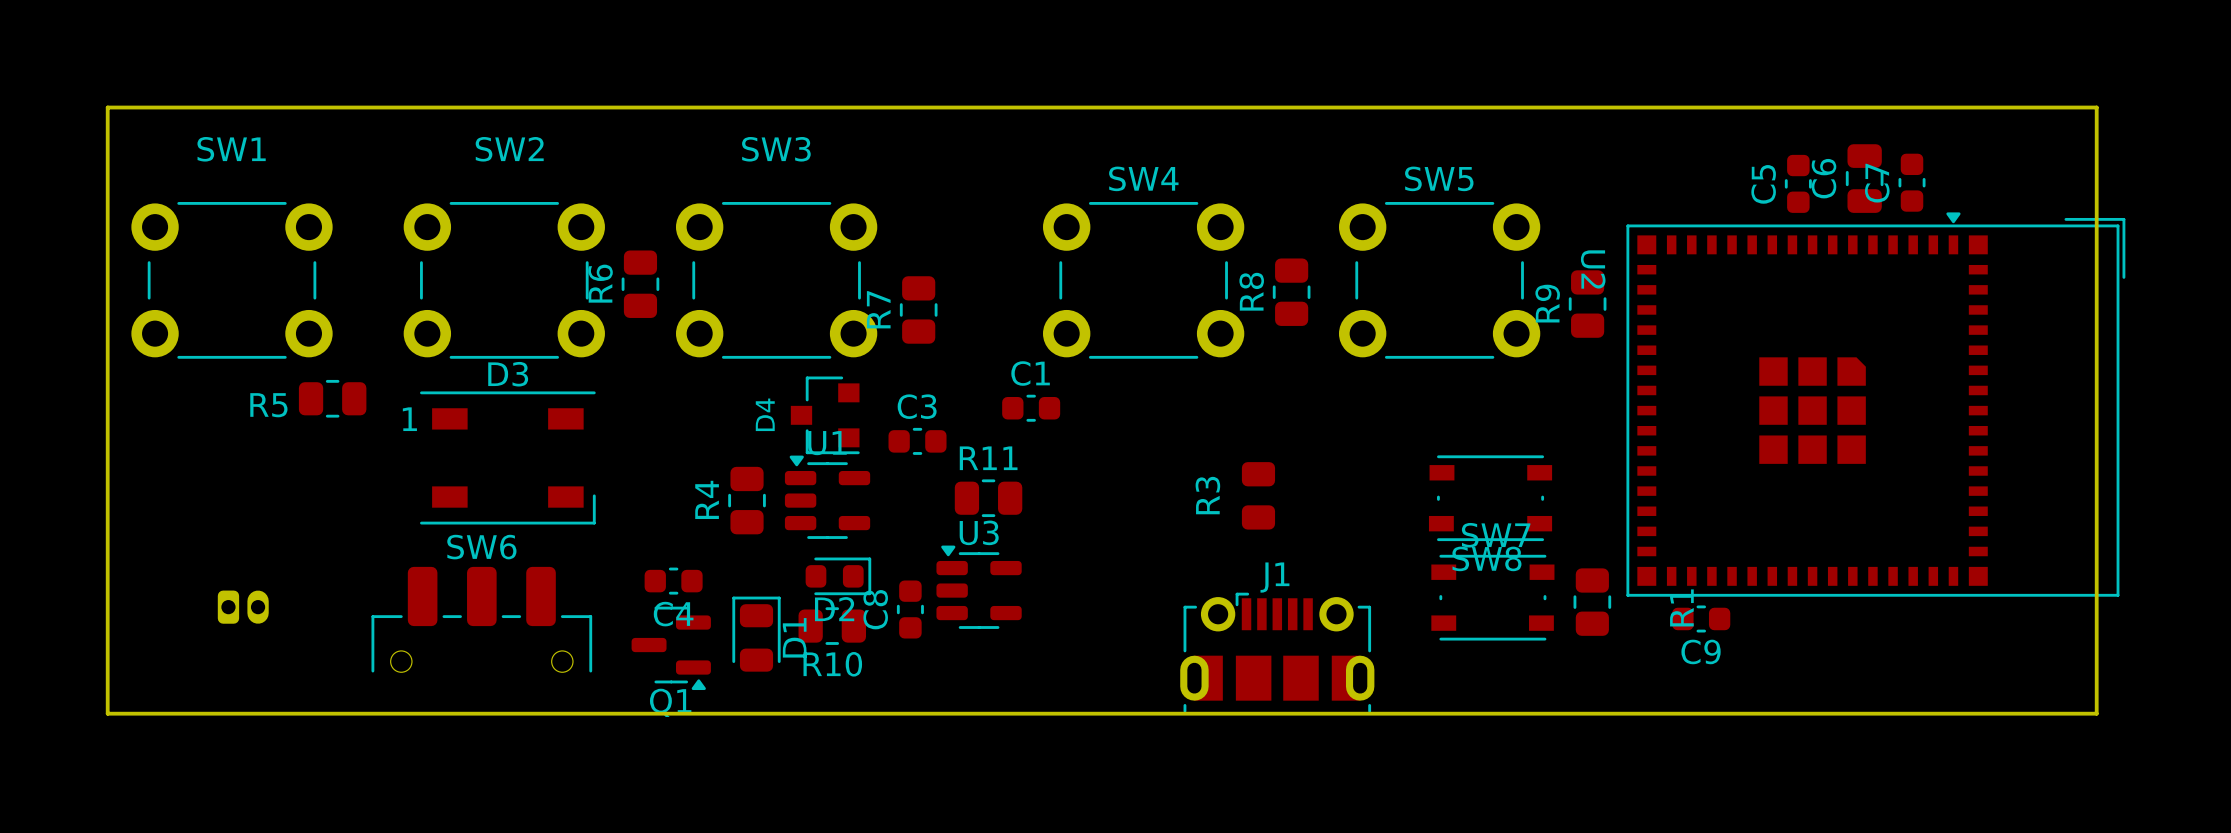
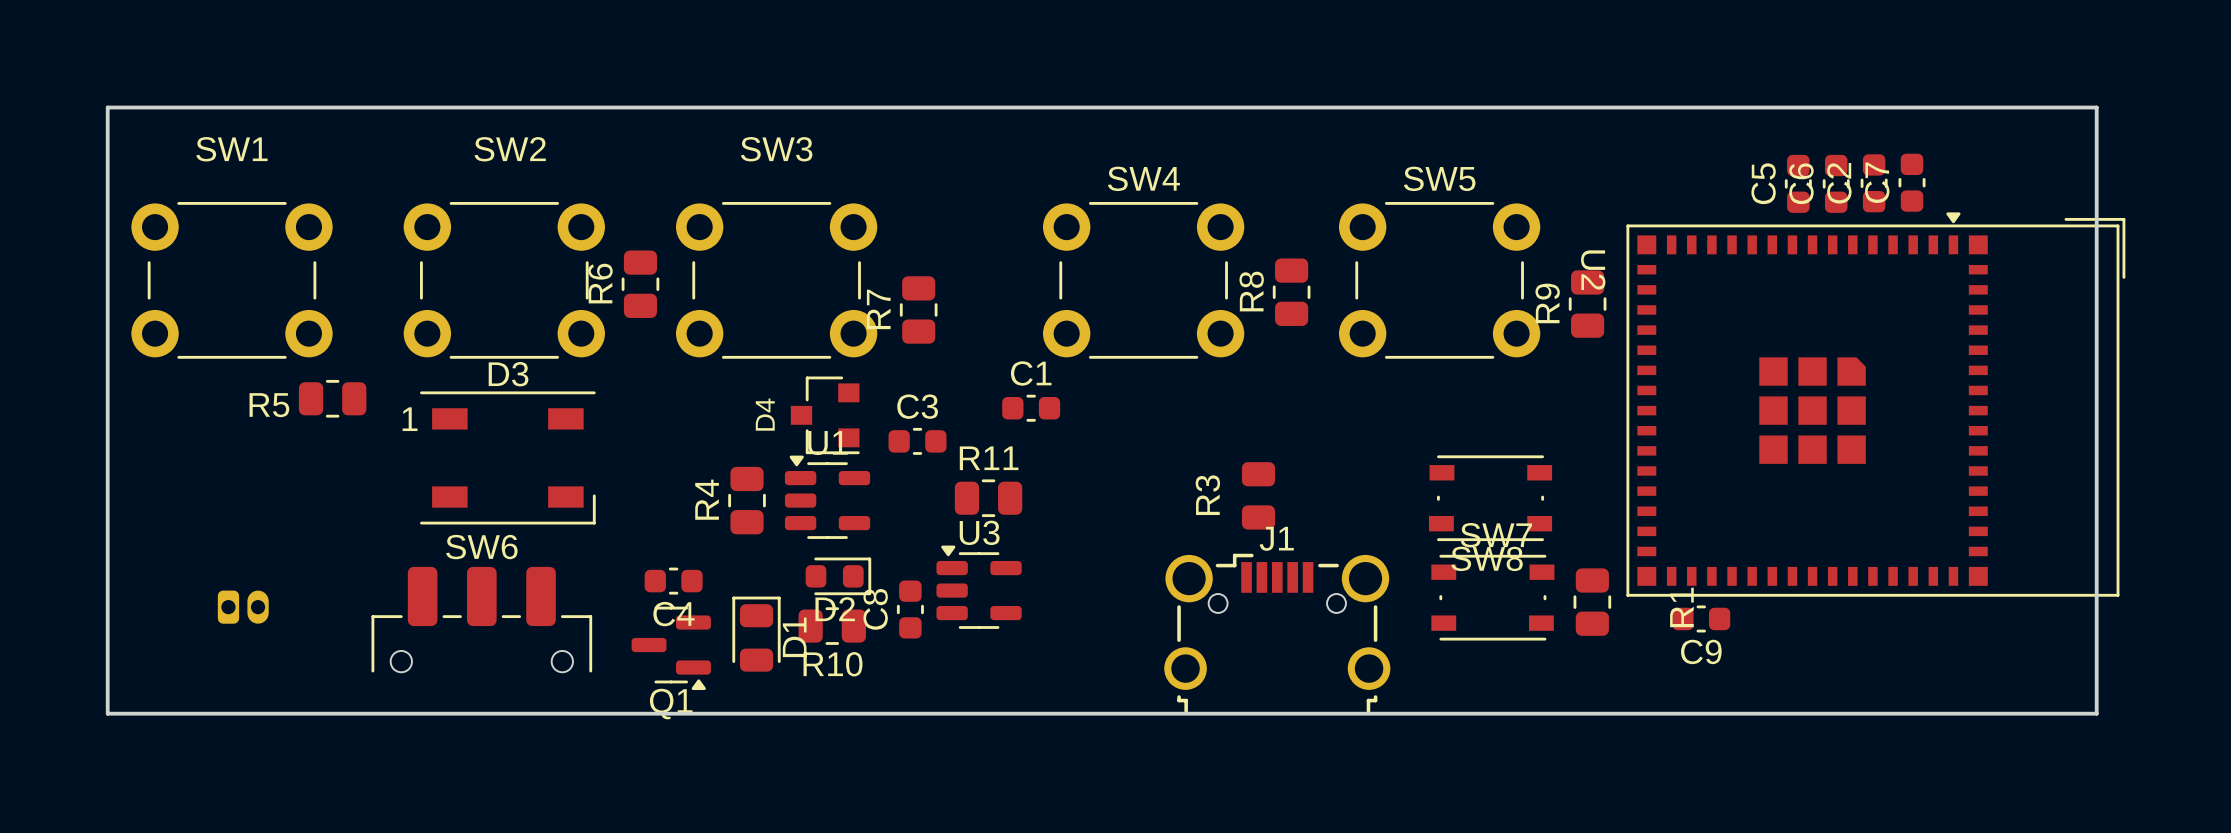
C6 footprint: [1845, 144, 1884, 213] -> [1822, 154, 1850, 213]
C2: none -> (1874, 183)
J1 footprint: [1180, 592, 1375, 713] -> [1164, 553, 1391, 713]

